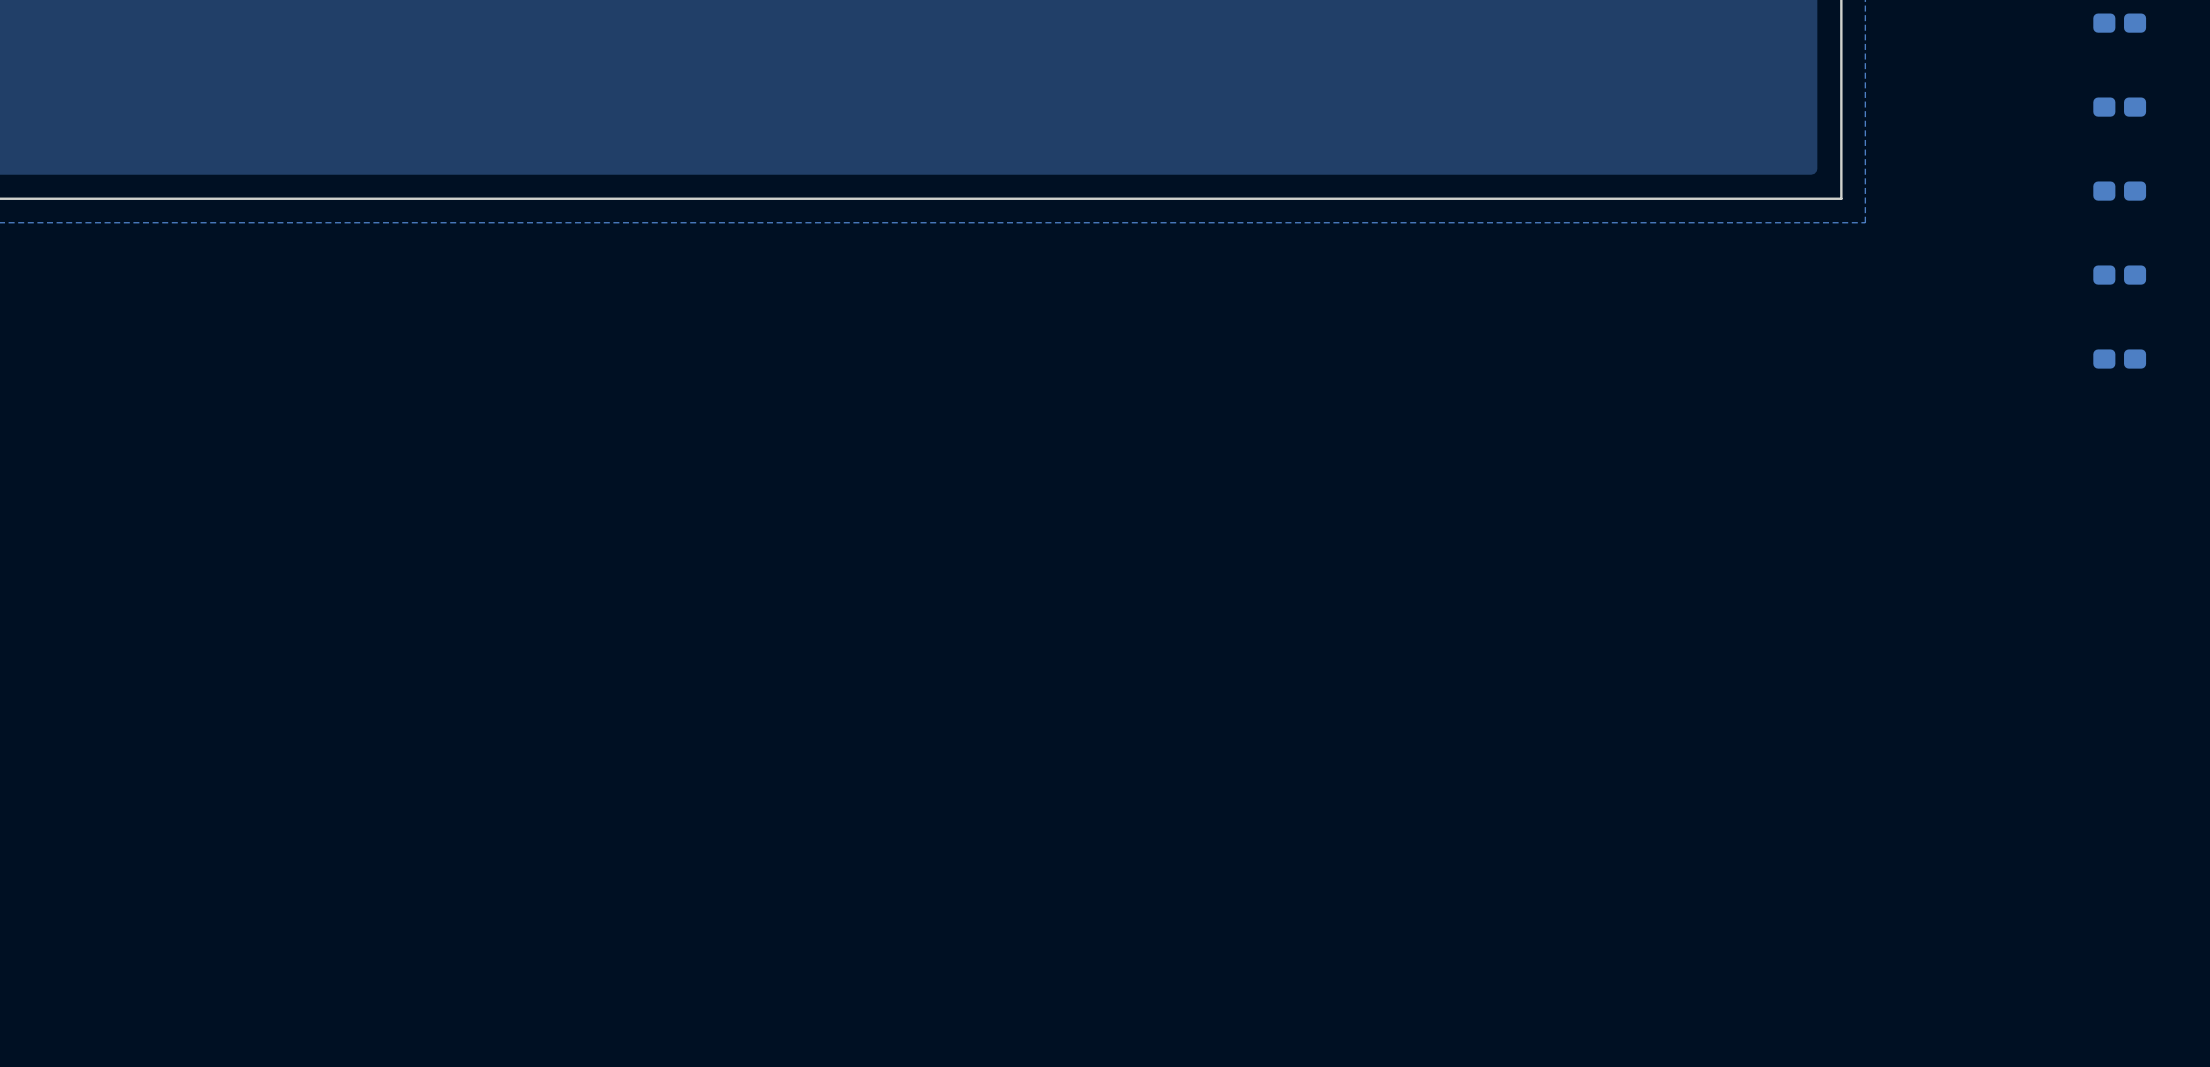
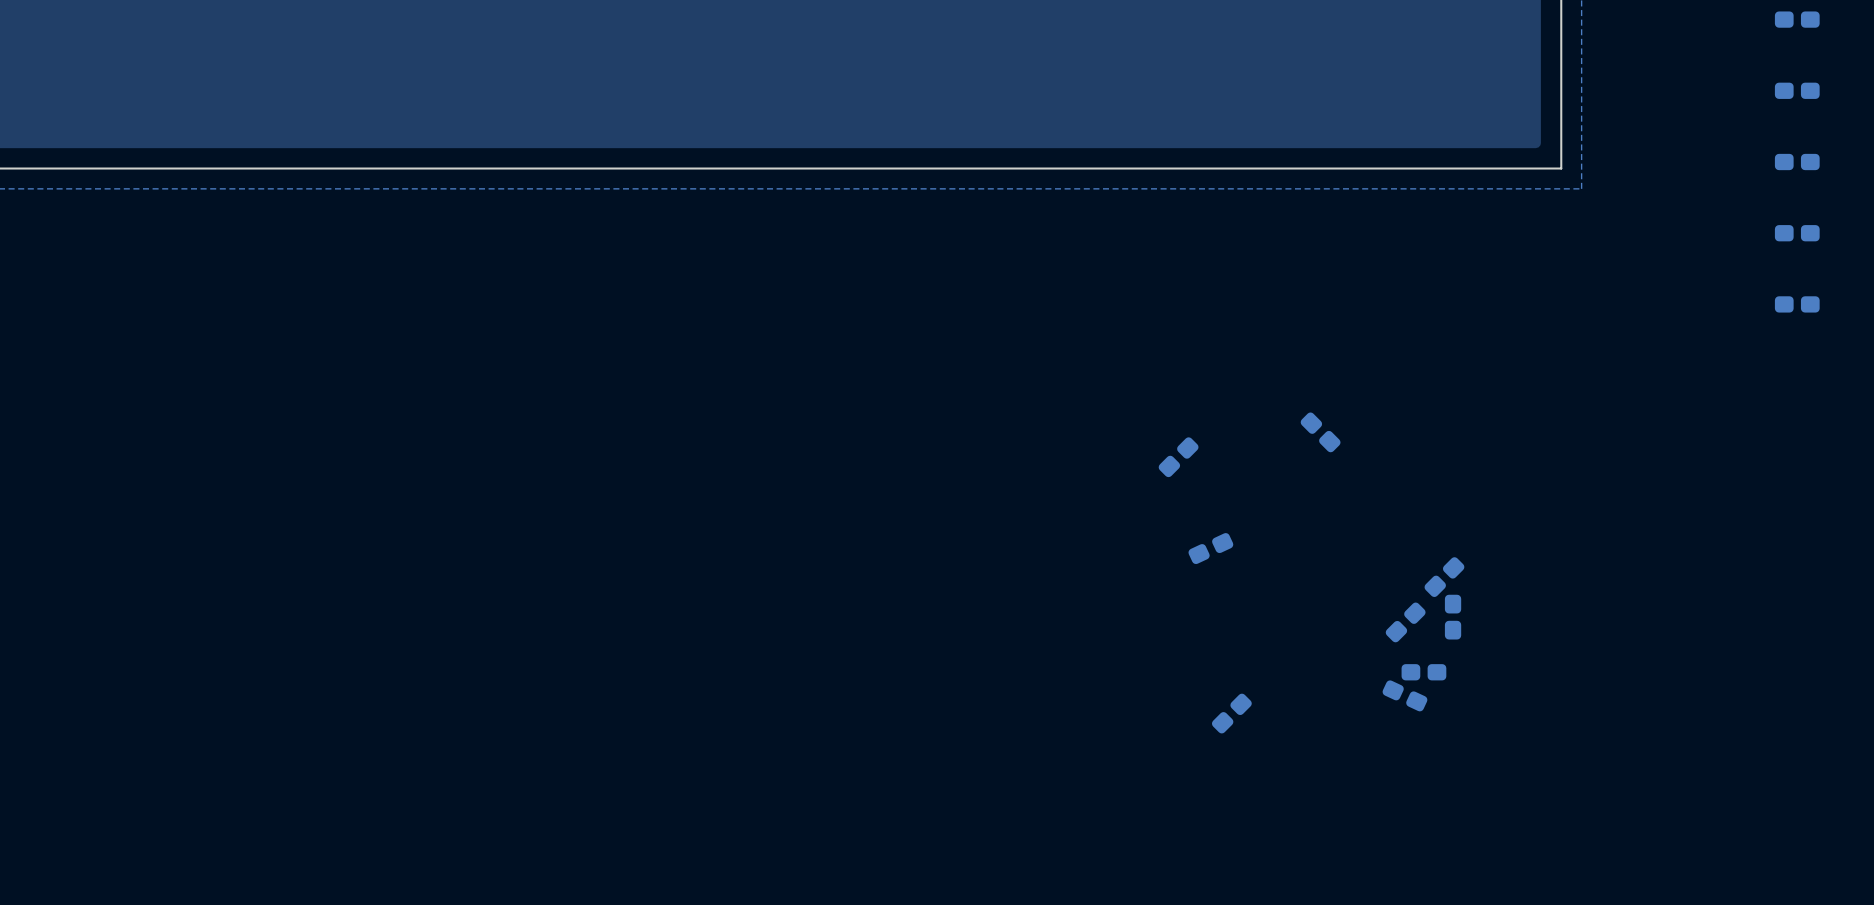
part: none -> (1320, 432)
part: none -> (1178, 457)
part: none -> (1210, 548)
part: none -> (1444, 577)
part: none -> (1453, 617)
part: none -> (1405, 622)
part: none -> (1423, 672)
part: none -> (1404, 695)
part: none -> (1231, 713)

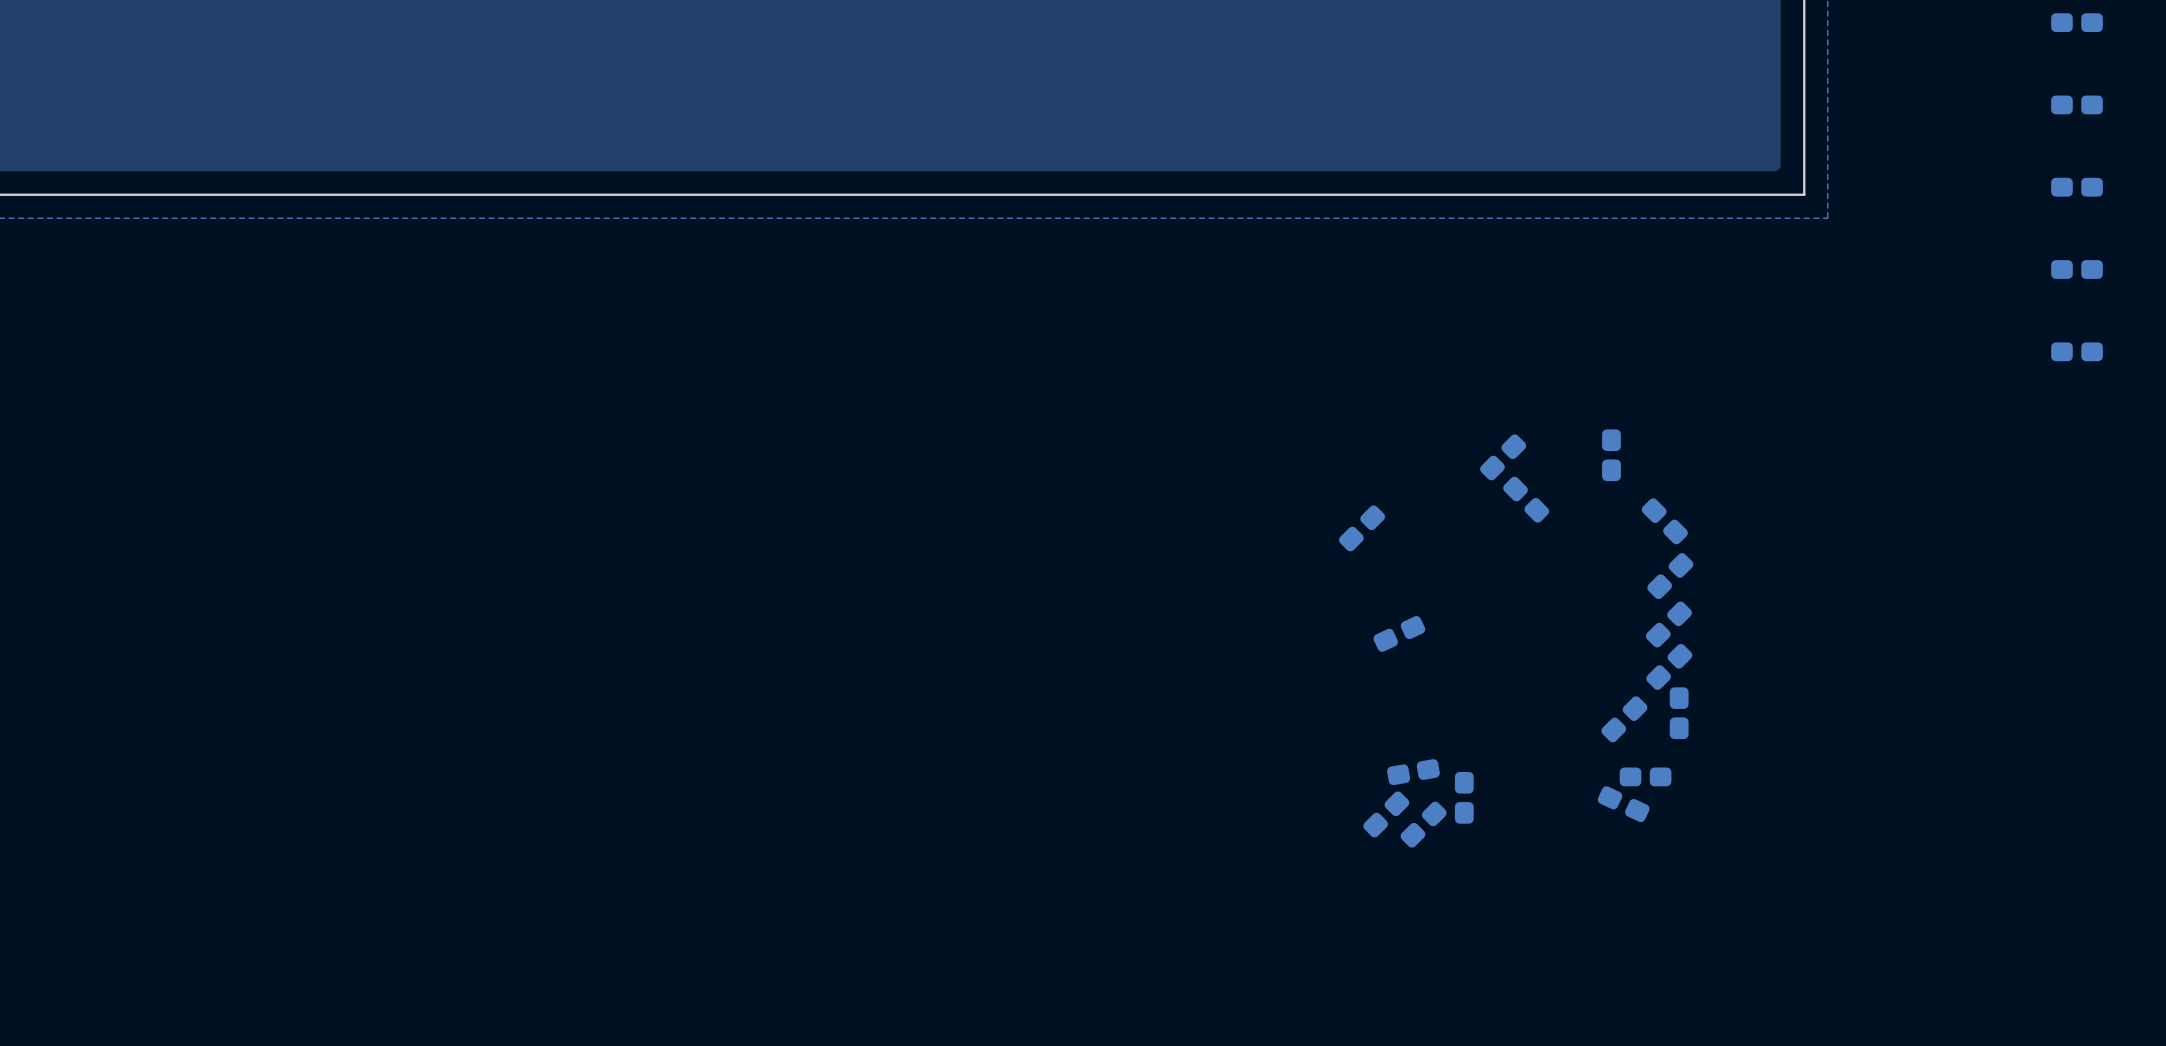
part: none -> (1611, 455)
part: none -> (1503, 457)
part: none -> (1664, 521)
part: none -> (1670, 576)
part: none -> (1668, 624)
part: none -> (1413, 772)
part: none -> (1464, 797)
part: none -> (1386, 814)

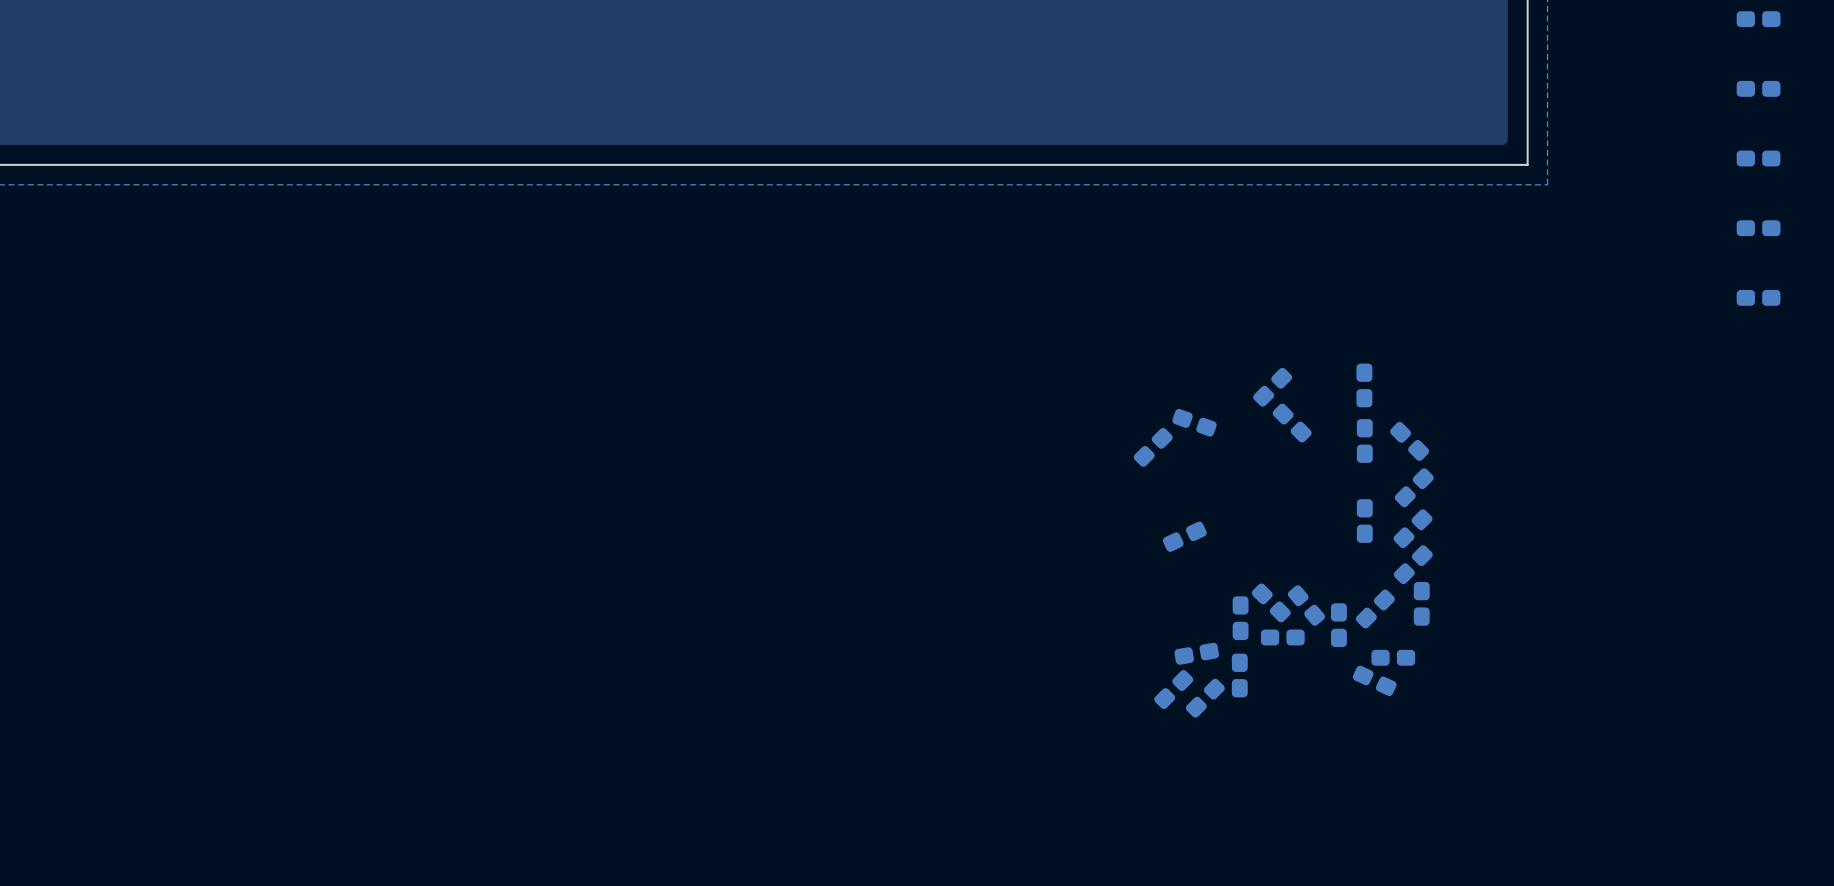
part: none -> (1194, 422)
part: none -> (1364, 441)
part: none -> (1364, 521)
part: none -> (1271, 602)
part: none -> (1306, 605)
part: none -> (1240, 618)
part: none -> (1338, 625)
part: none -> (1282, 637)

